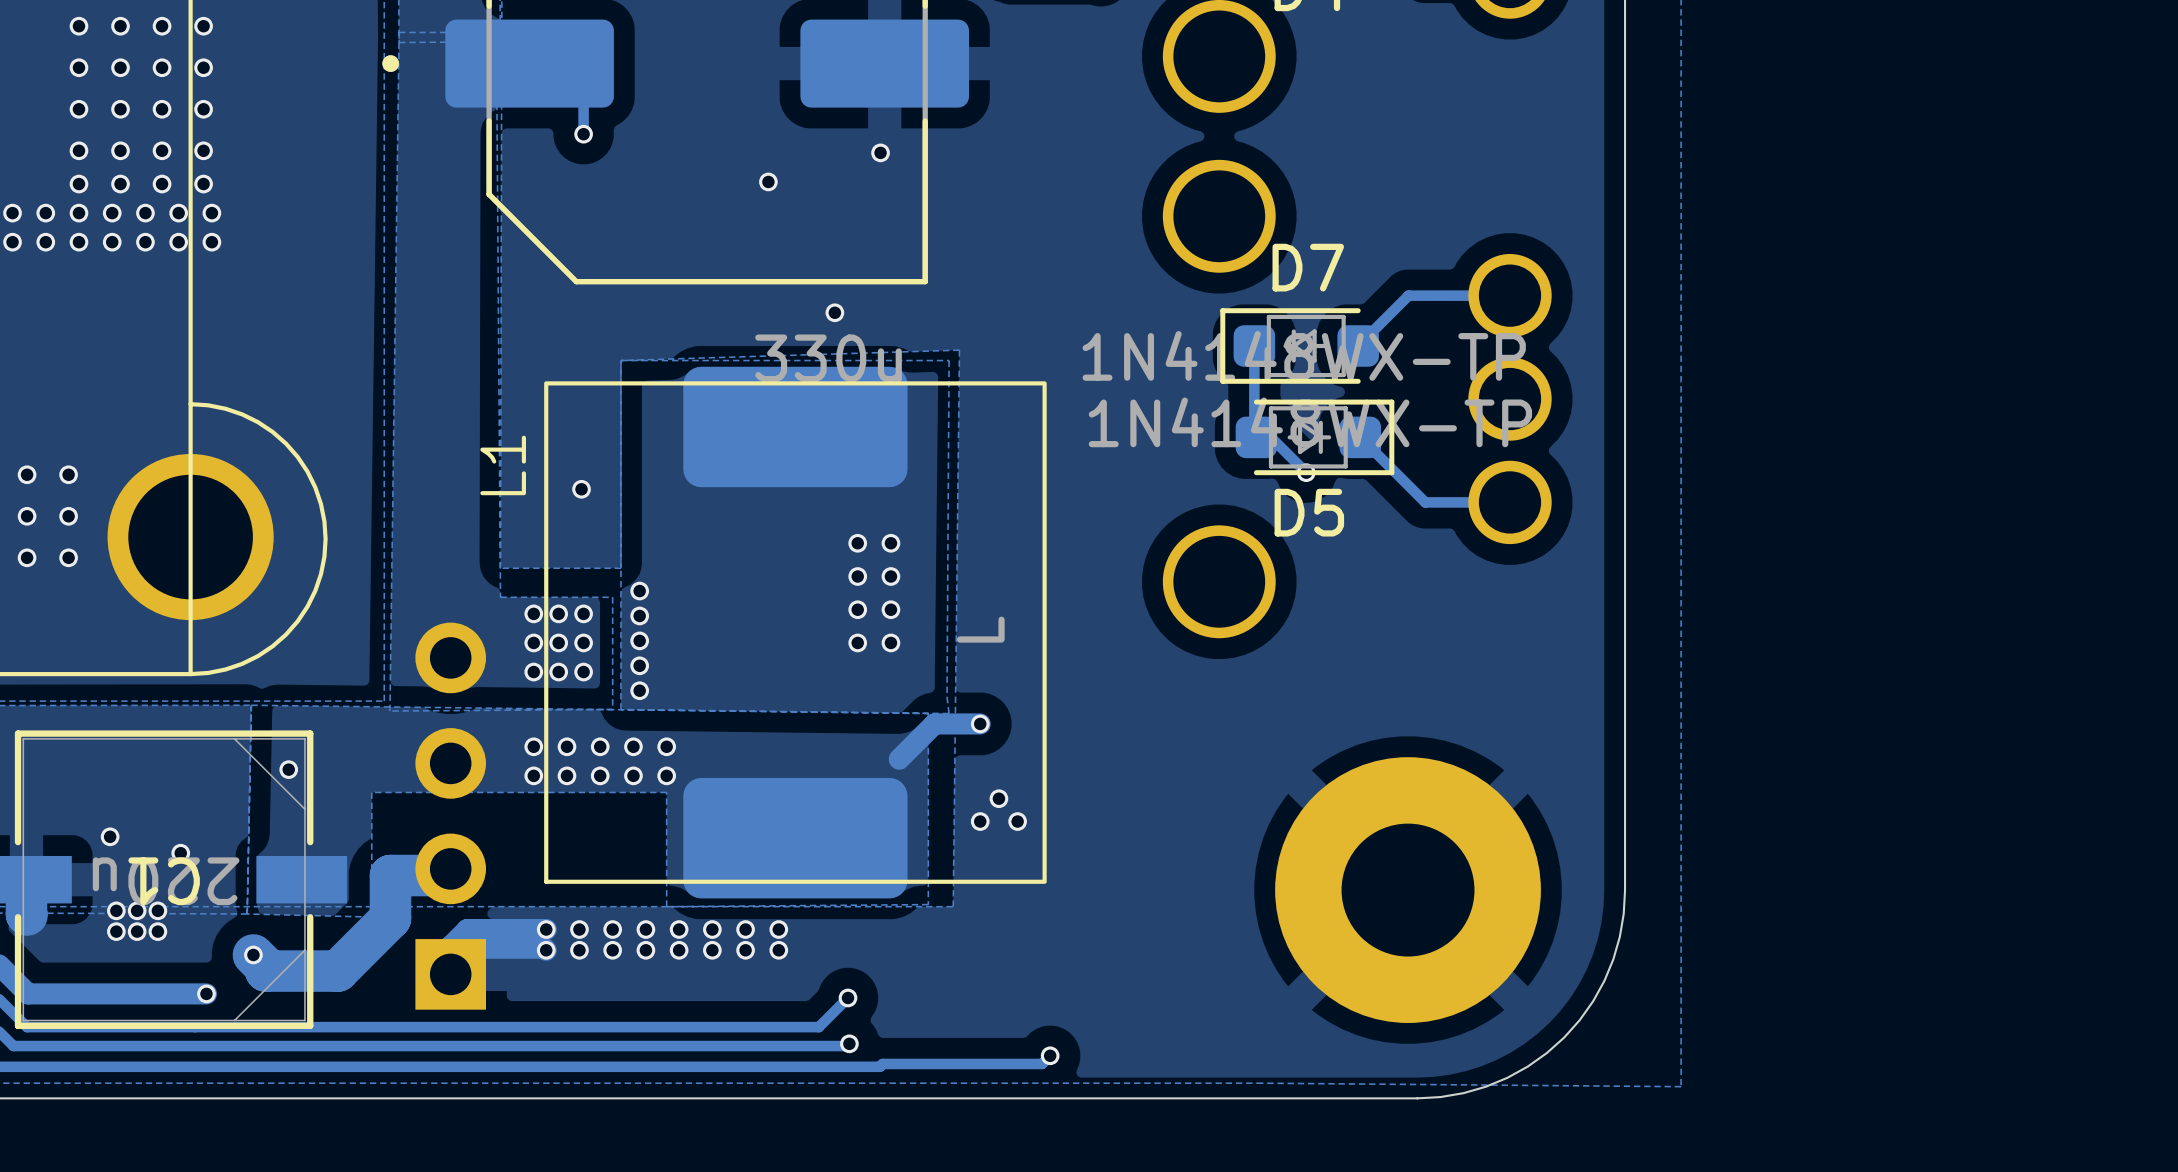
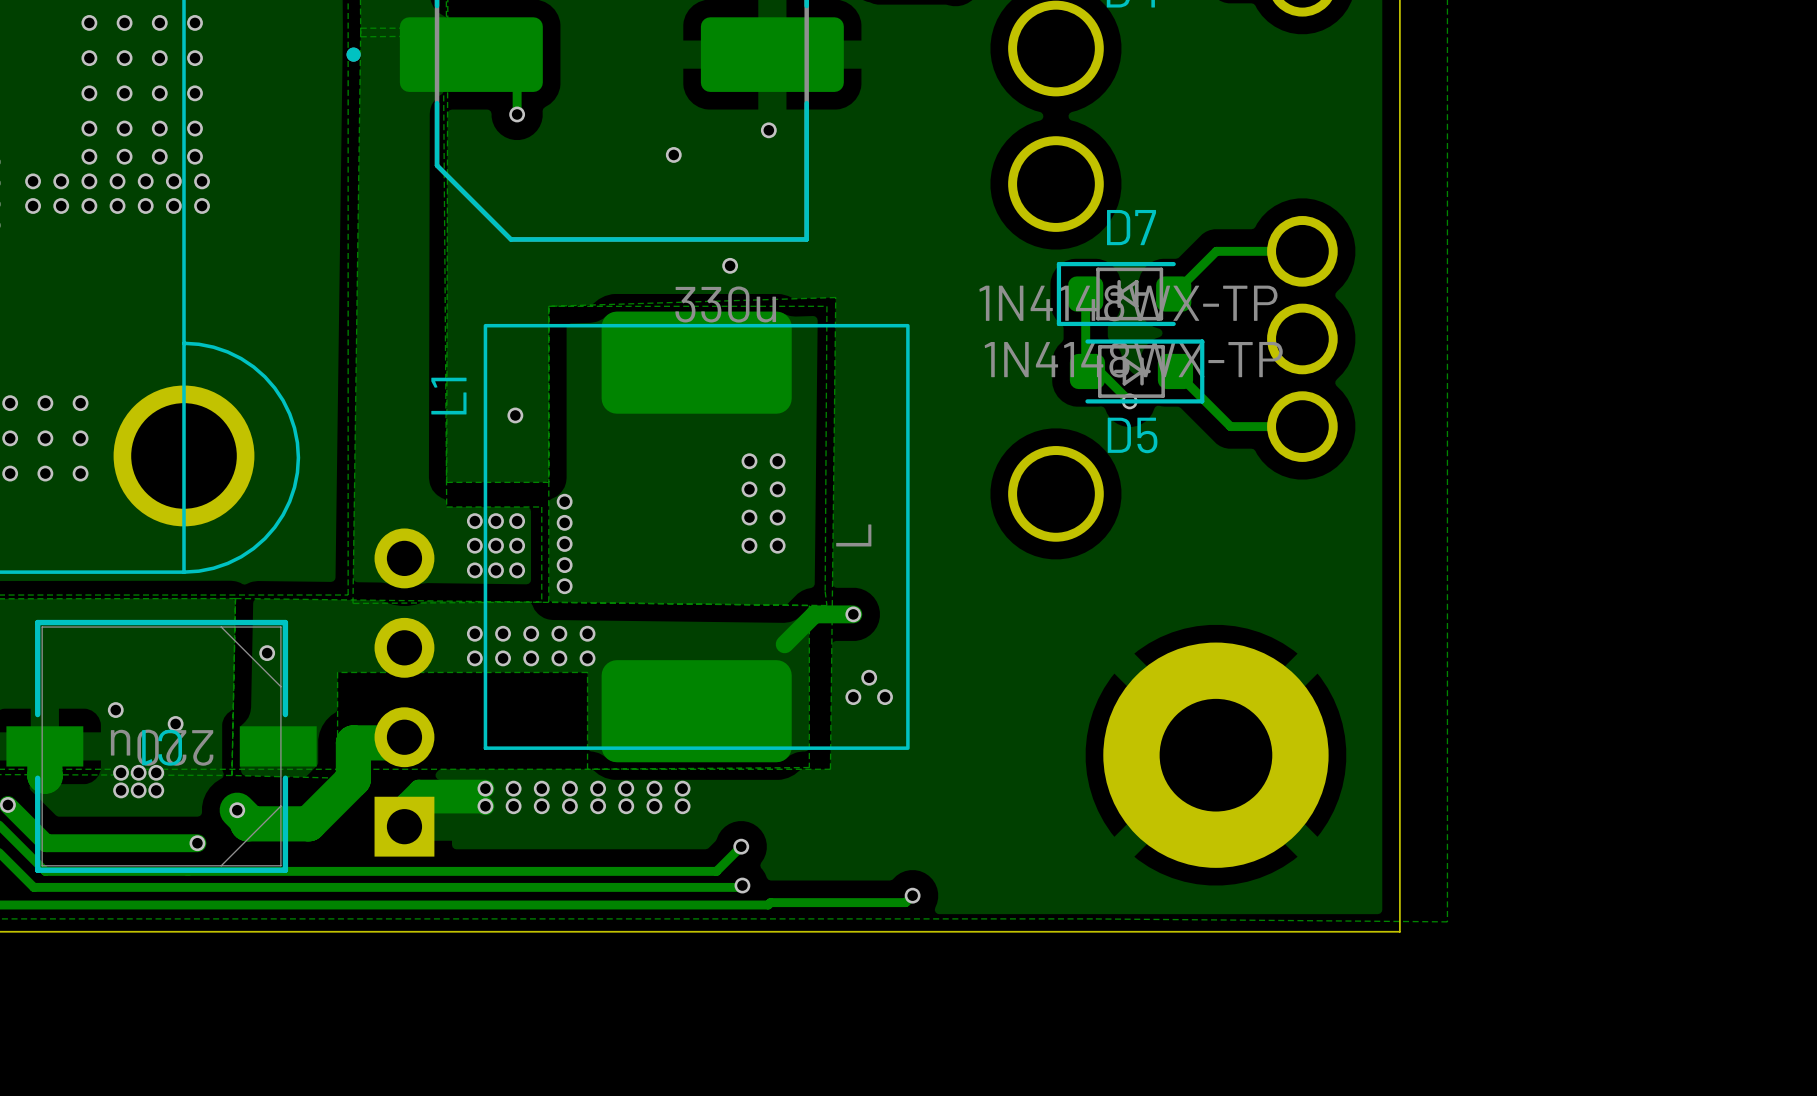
board edge: (1625, 890) (1619, 936) (1604, 980) (1593, 1001) (1564, 1037) (1546, 1053) (1507, 1077) (1463, 1093) (1417, 1098) -> (1399, 755) (1399, 931) (1223, 931)

